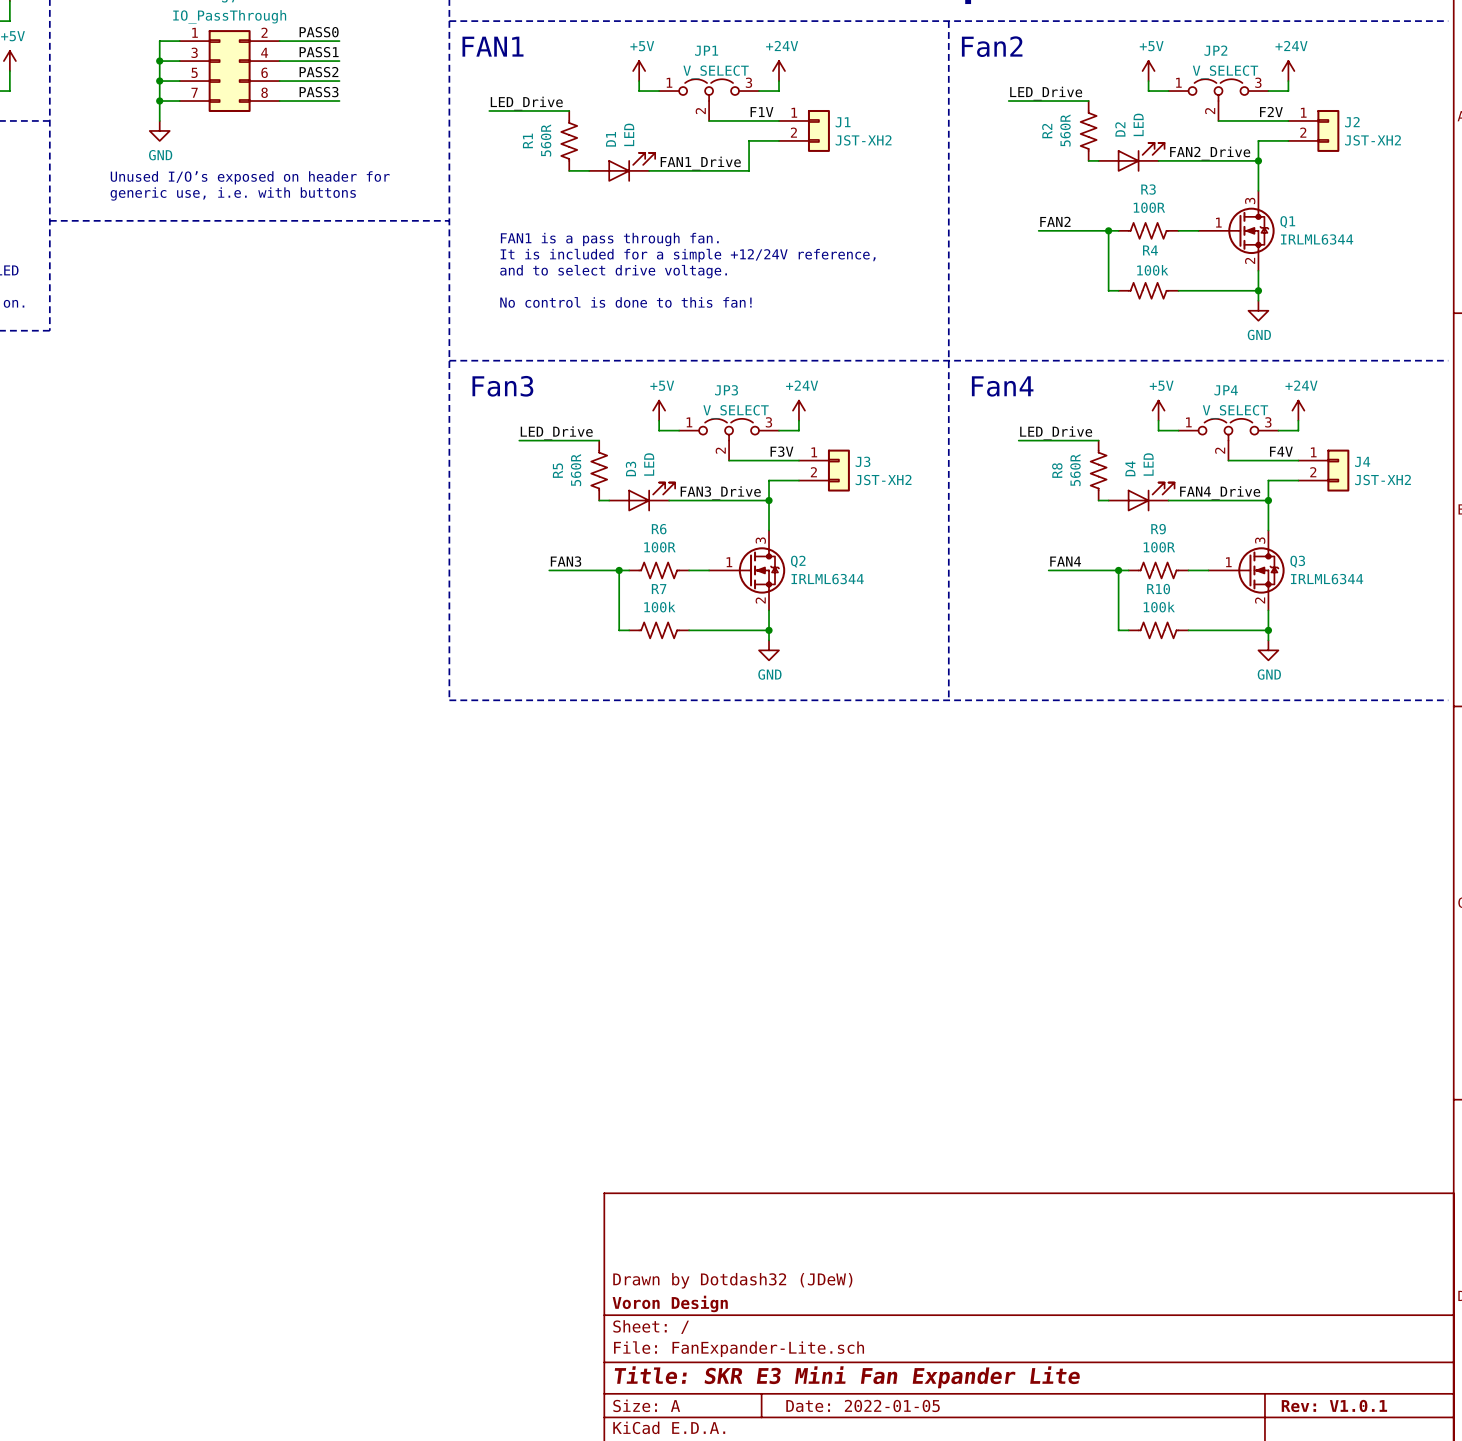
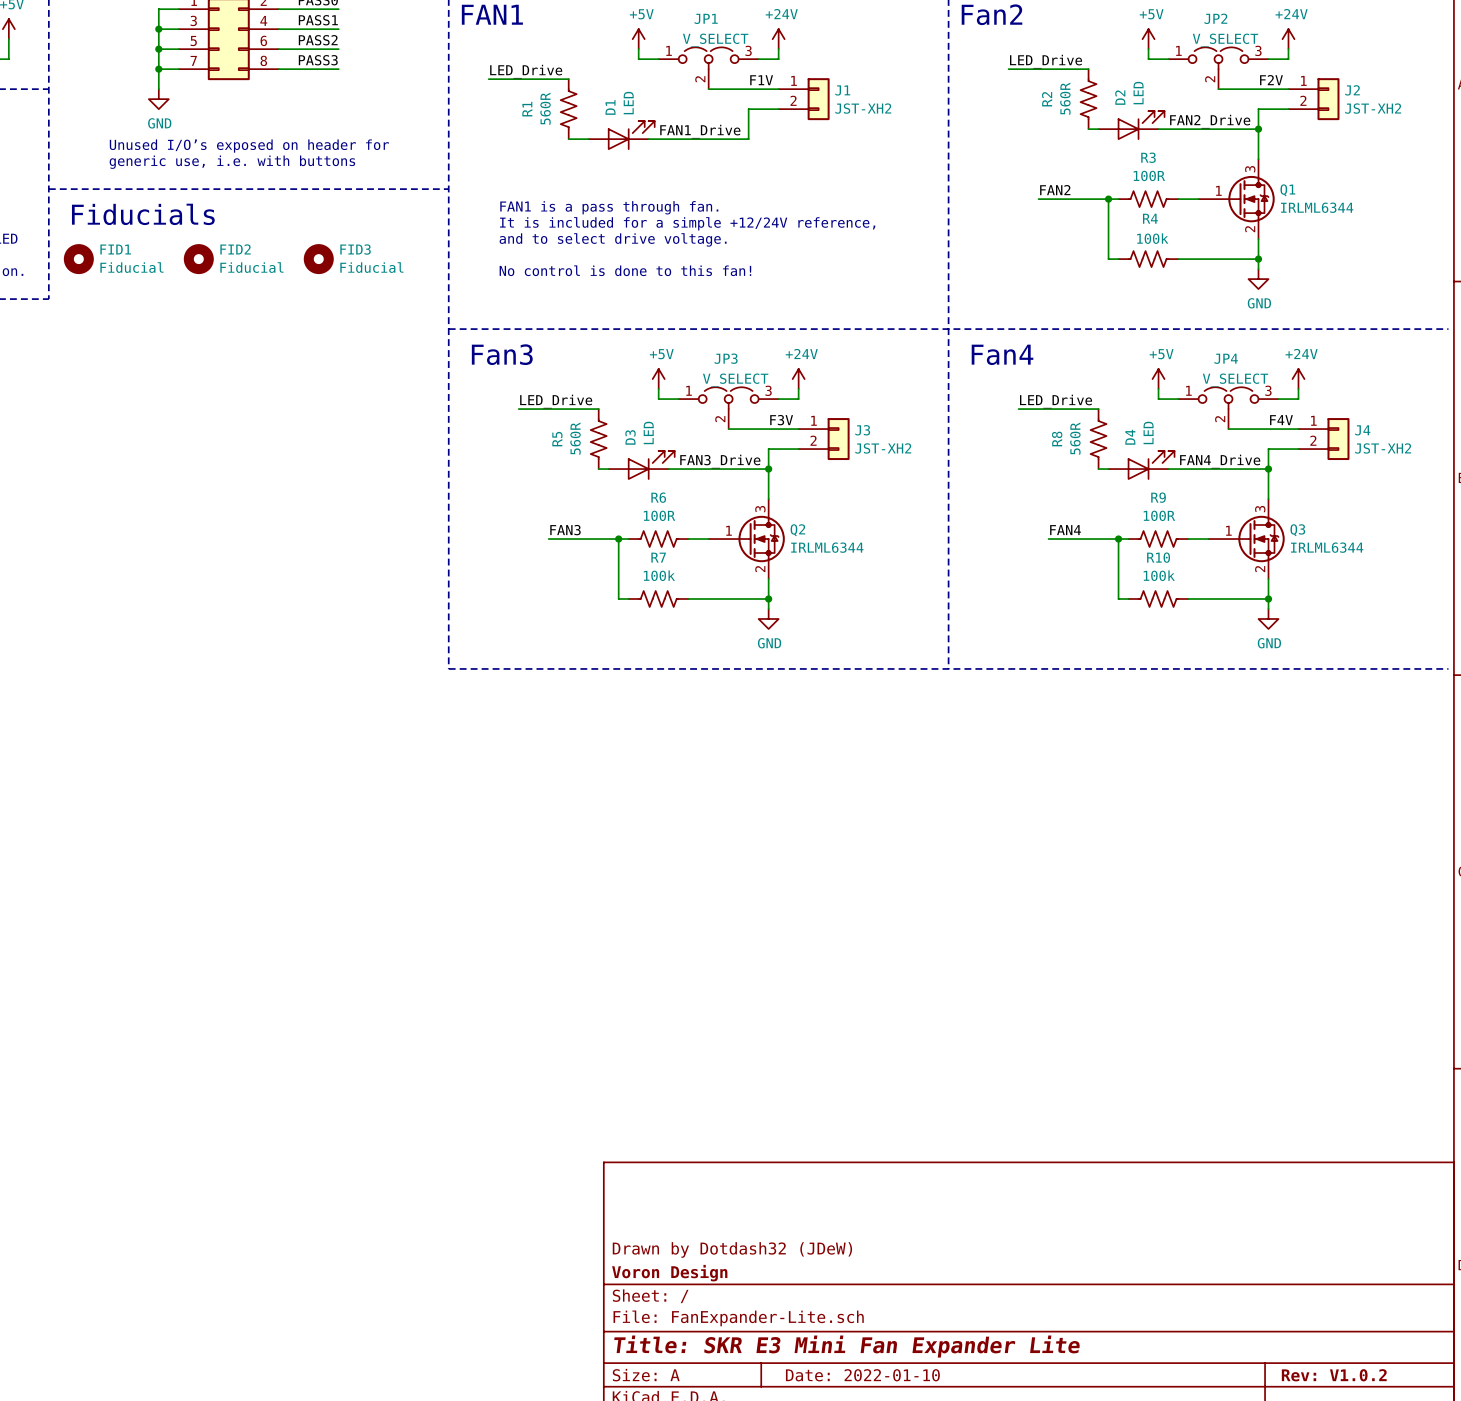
text: none -> Fiducials (143, 214)
FID1: none -> Fiducial (78, 259)
FID2: none -> Fiducial (198, 259)
FID3: none -> Fiducial (318, 259)
title block: Date: 2022-01-05 (863, 1405) -> Date: 2022-01-10 (862, 1375)
title block: Rev: V1.0.1 (1334, 1405) -> Rev: V1.0.2 (1334, 1375)

